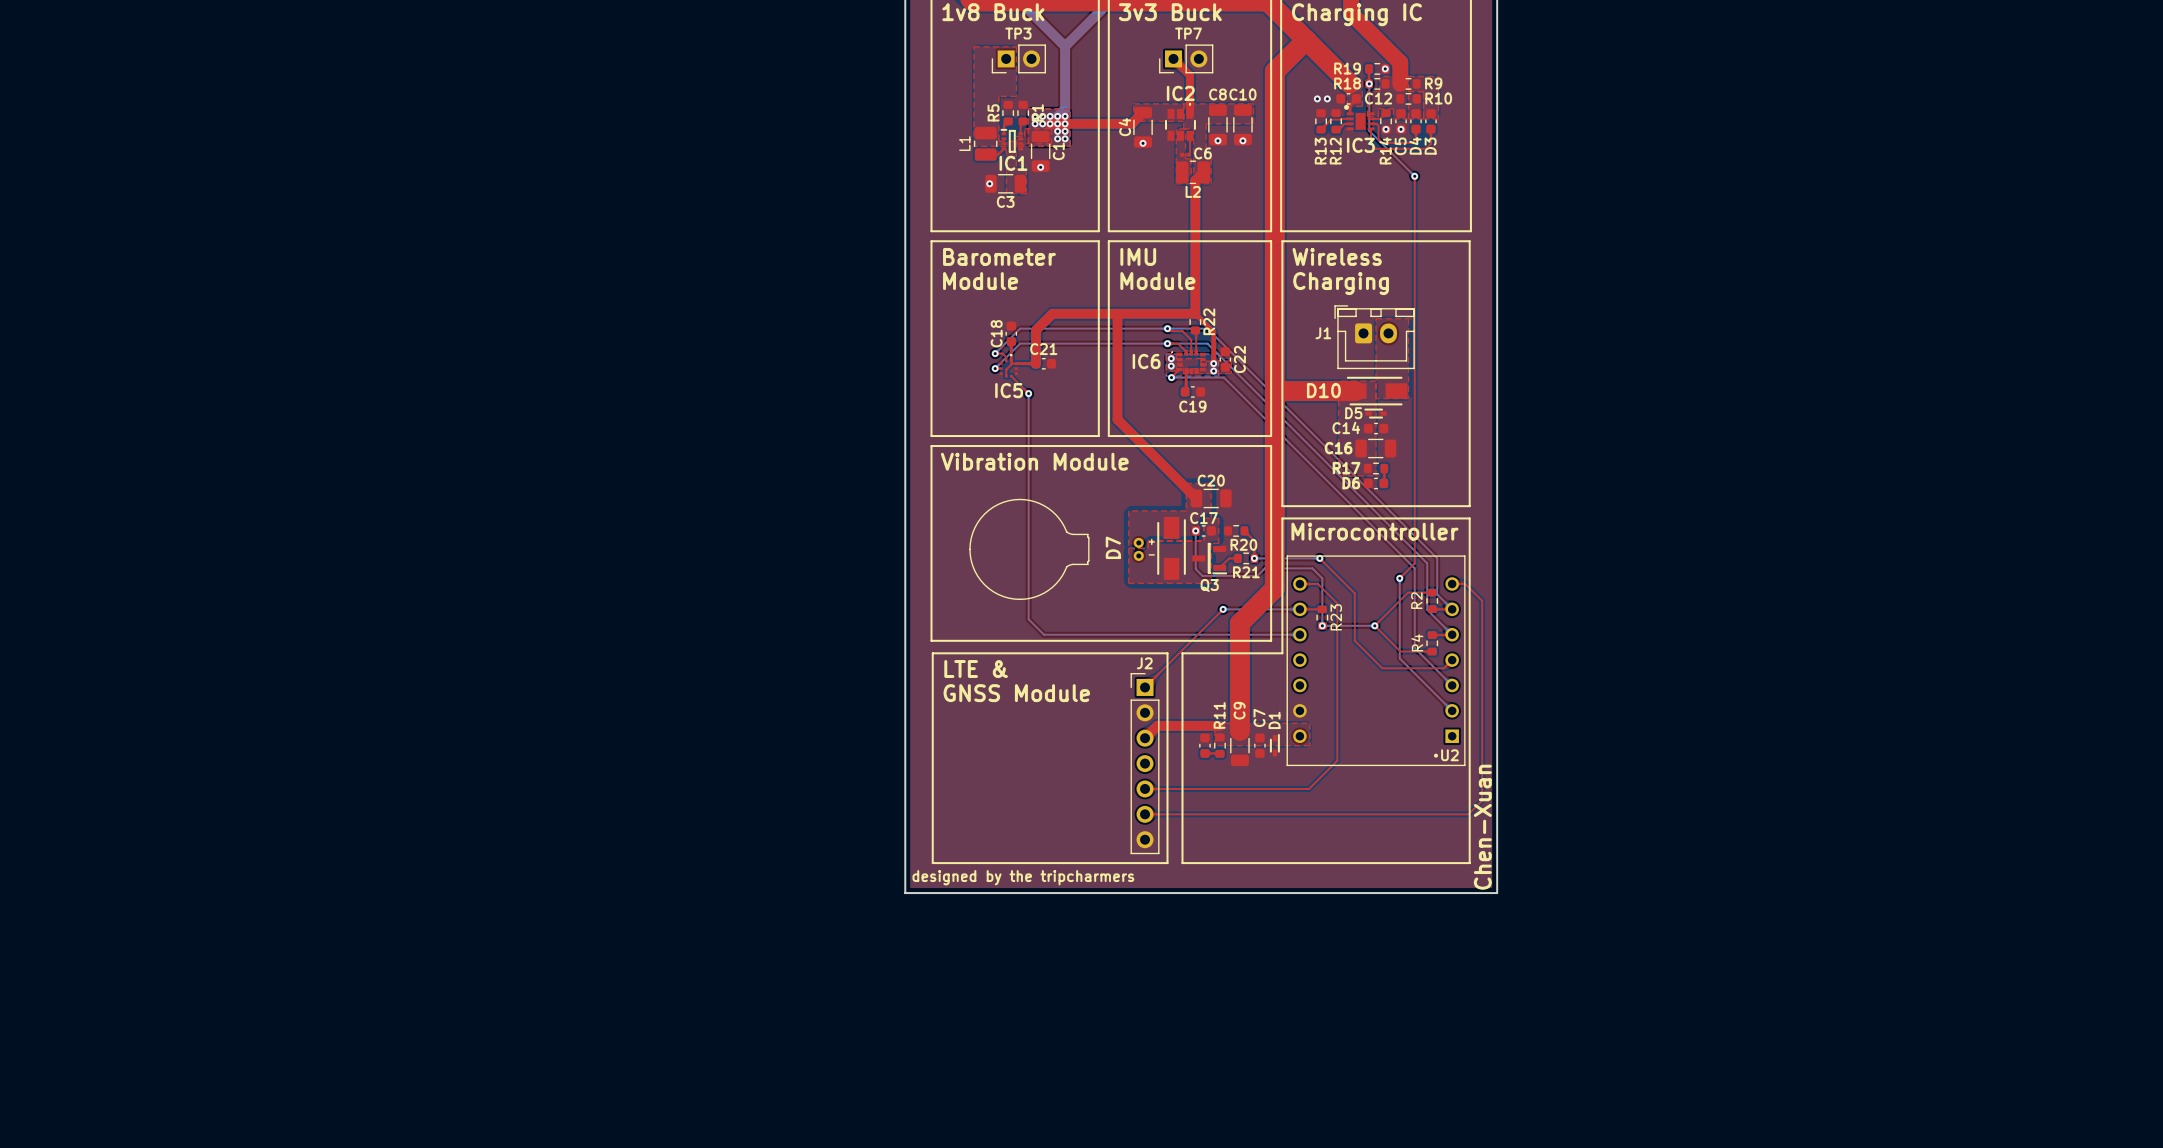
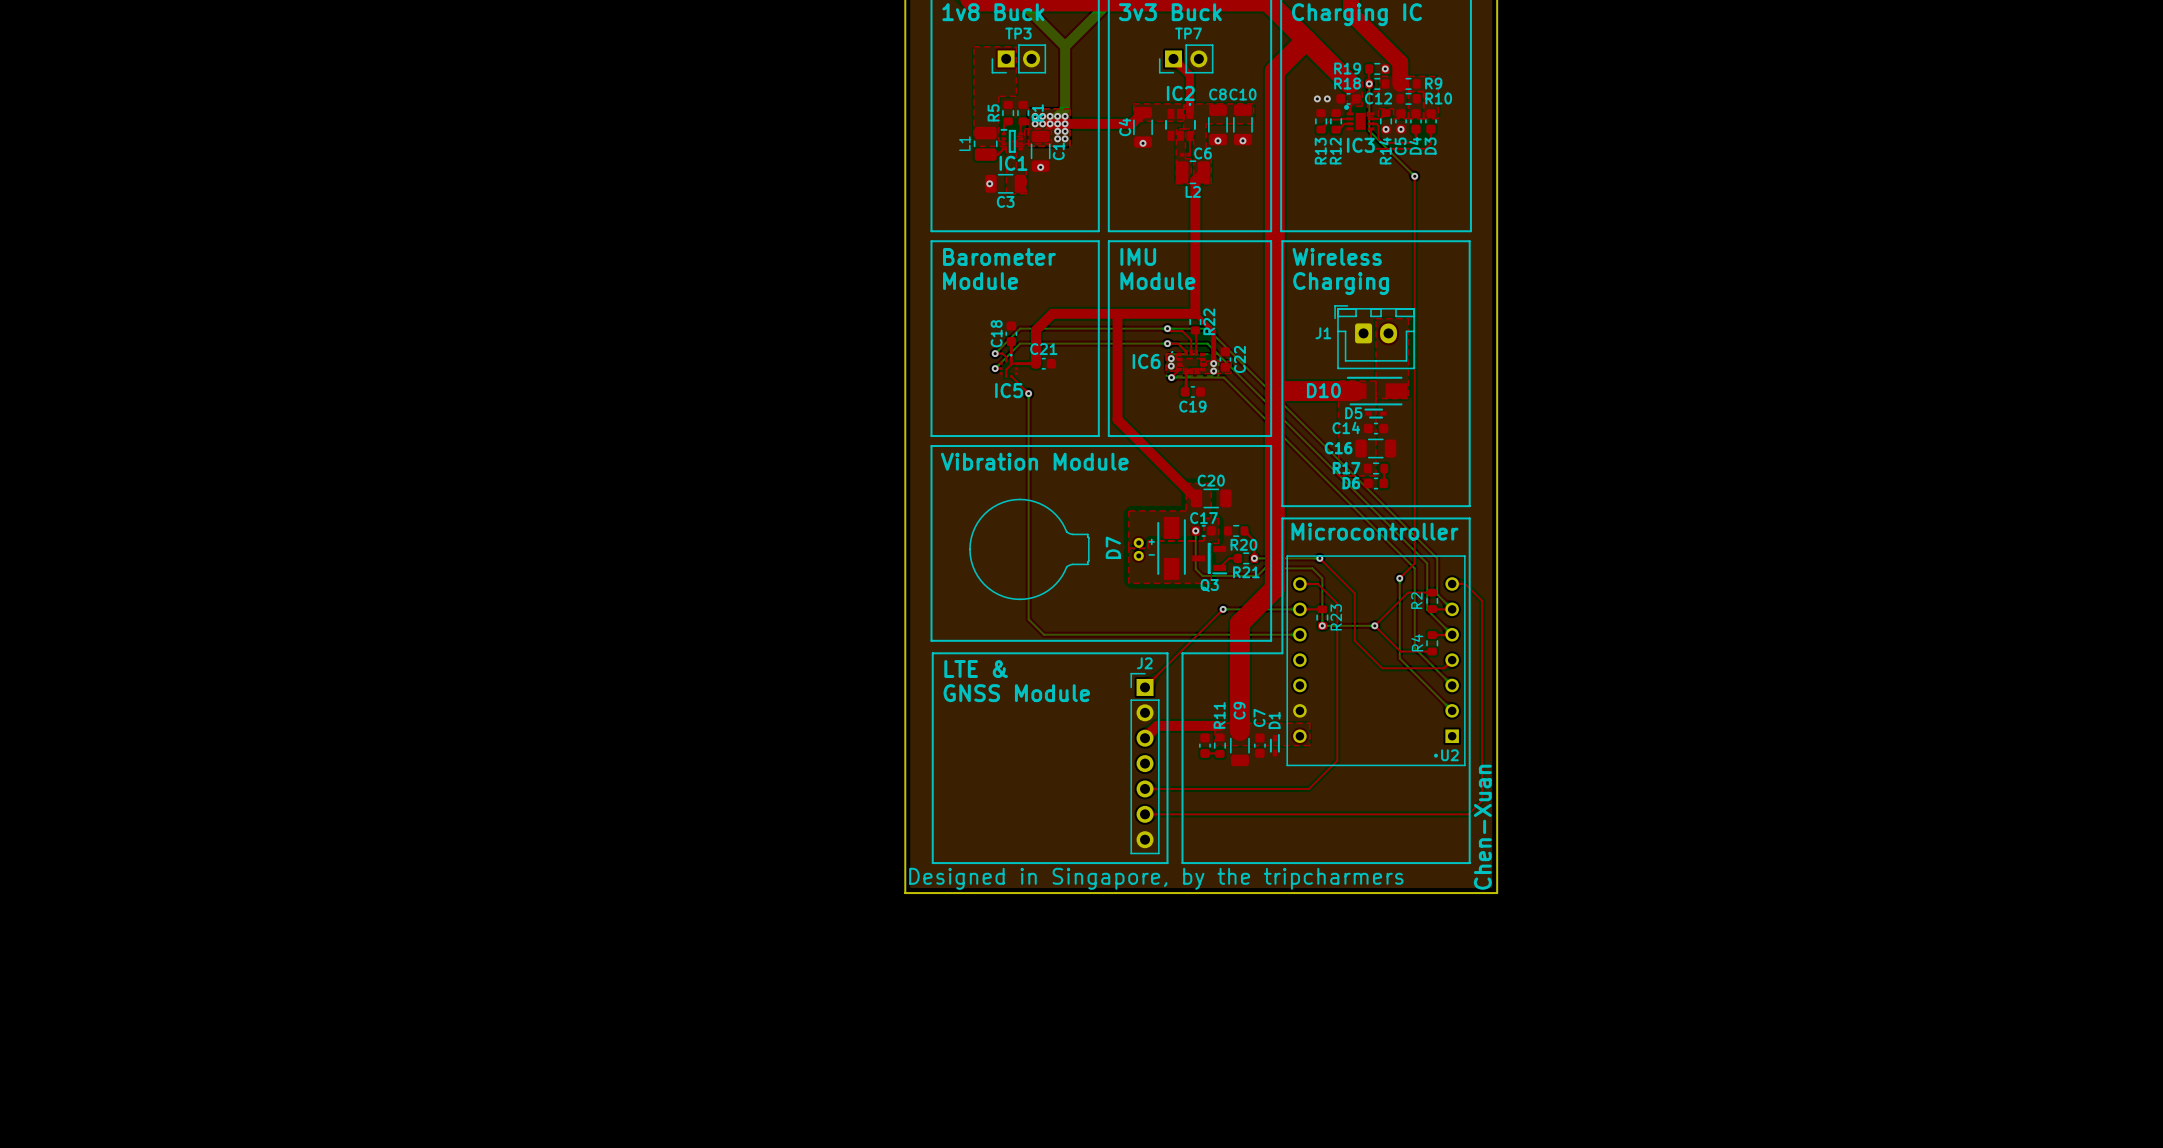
text: designed by the tripcharmers (1023, 877) -> Designed in Singapore, by the tripcharmers (1156, 878)

